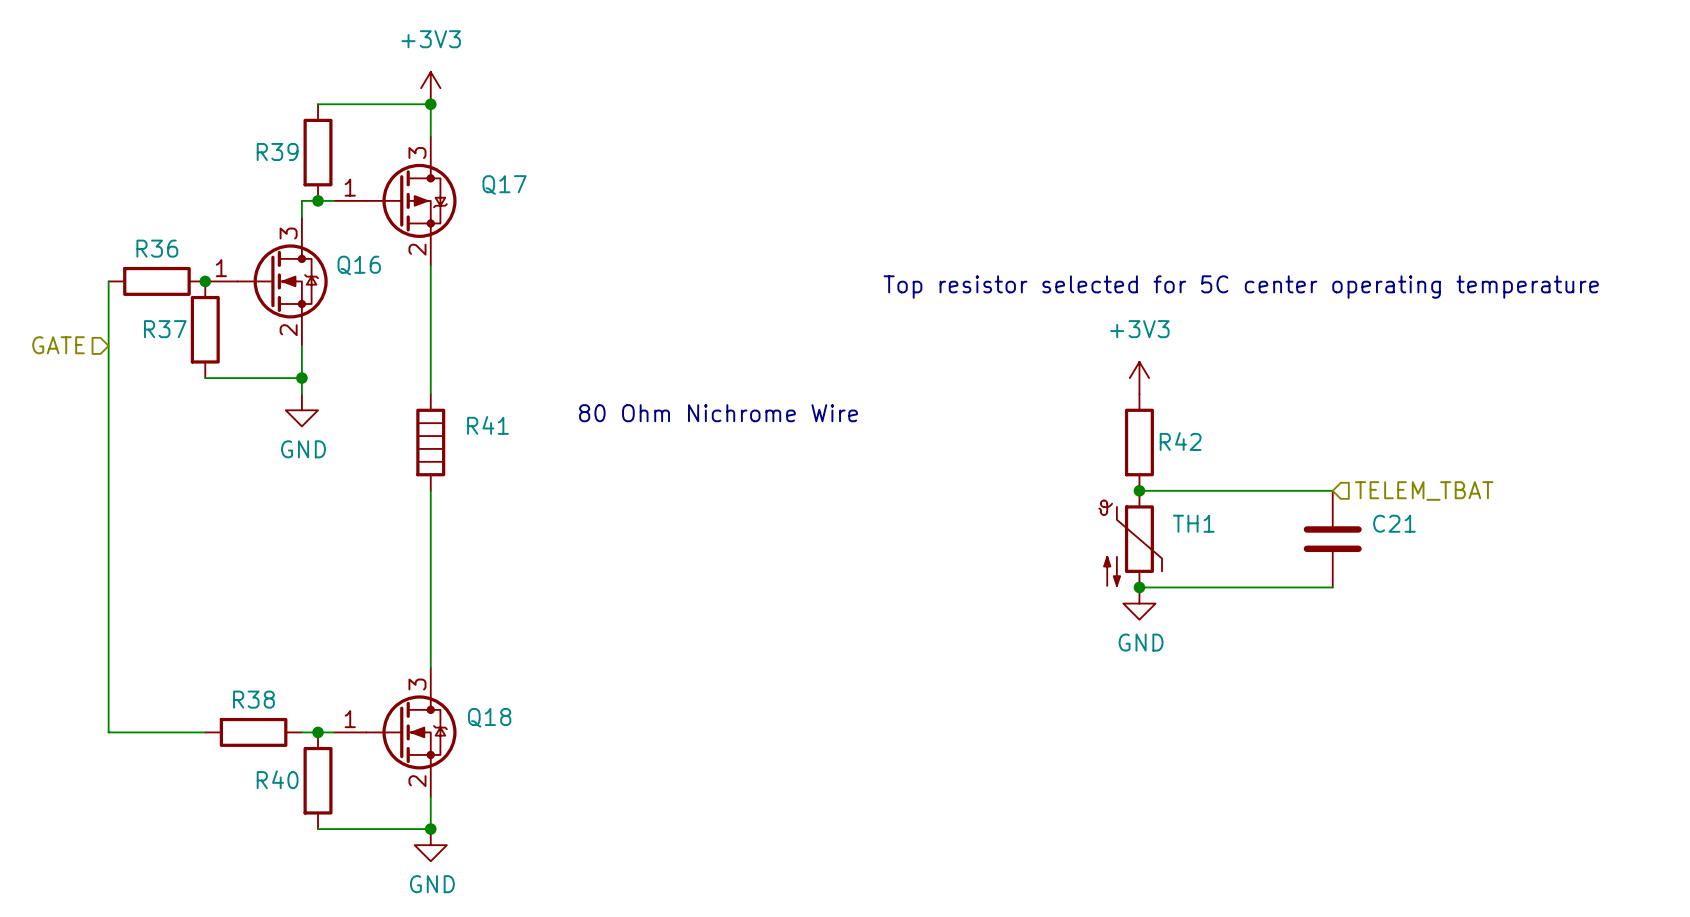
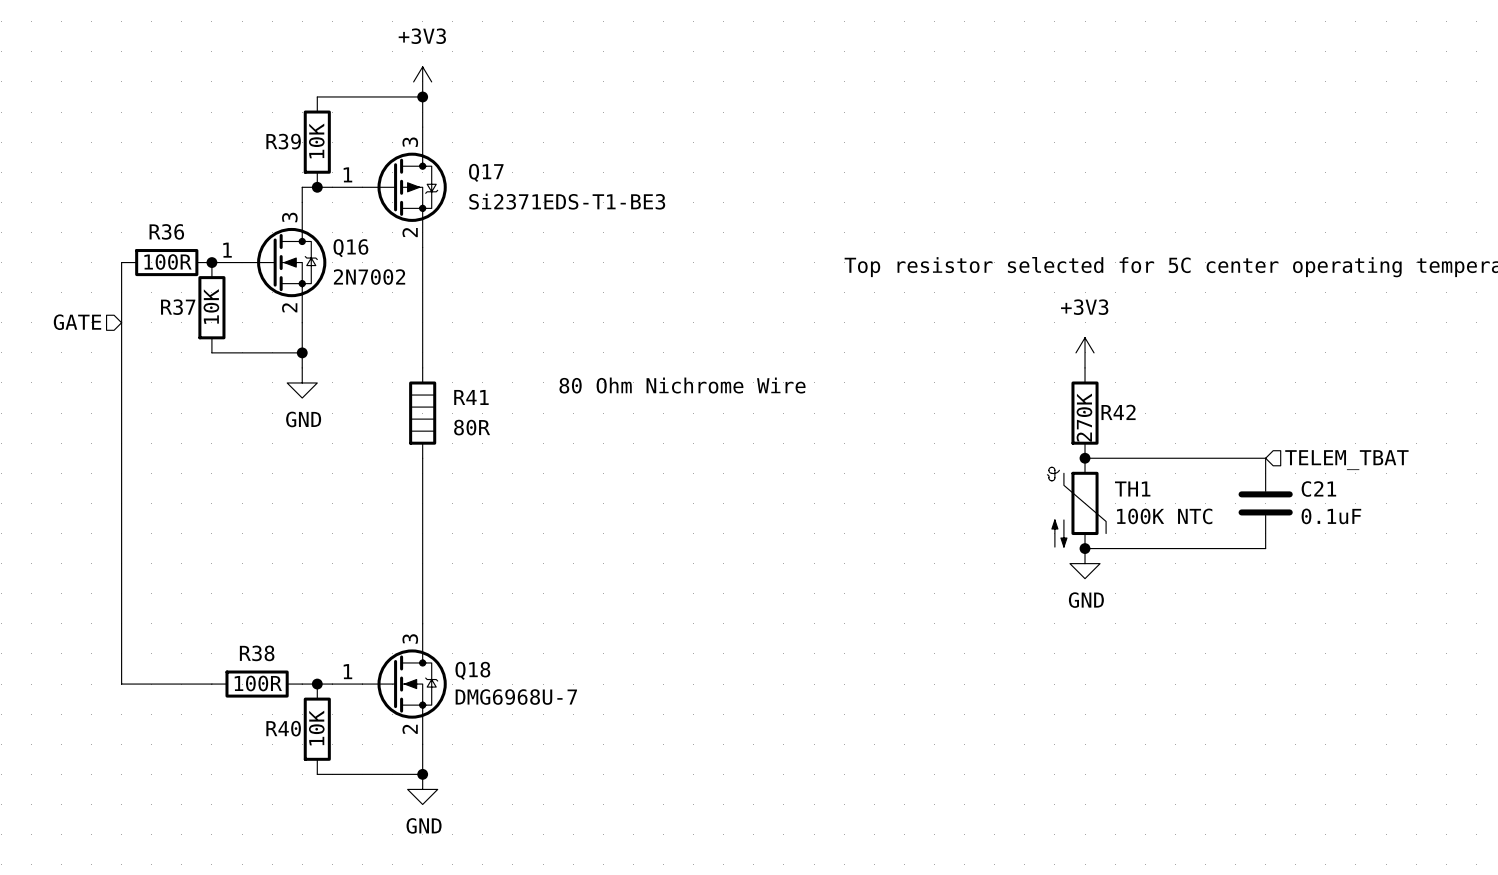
R39 value: none -> 10K (316, 140)
Q17 value: none -> Si2371EDS-T1-BE3 (567, 201)
R36 value: none -> 100R (168, 262)
Q16 value: none -> 2N7002 (369, 277)
R37 value: none -> 10K (211, 306)
R42 value: none -> 270K (1084, 417)
R41 value: none -> 80R (472, 427)
TH1 value: none -> 100K NTC (1164, 516)
C21 value: none -> 0.1uF (1331, 516)
R38 value: none -> 100R (258, 683)
Q18 value: none -> DMG6968U-7 (516, 697)
R40 value: none -> 10K (316, 728)

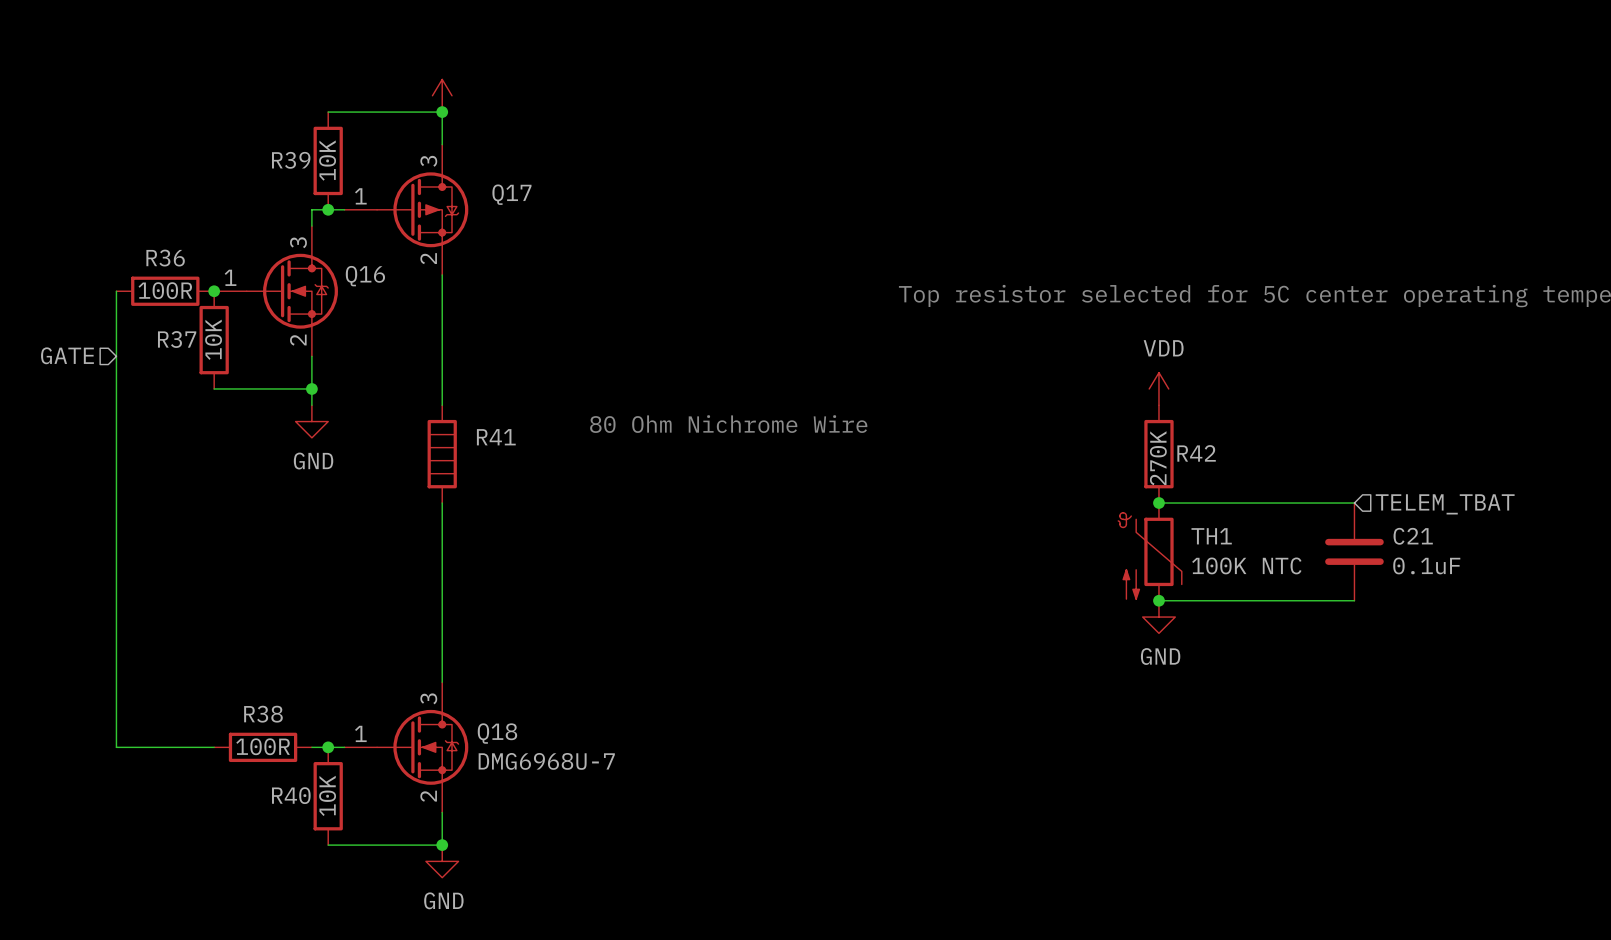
power symbol text: +3V3 (422, 36) -> none
Q17 value: Si2371EDS-T1-BE3 (567, 201) -> none
Q16 value: 2N7002 (369, 277) -> none
power symbol: +3V3 (1085, 352) -> VDD (1158, 388)
R41 value: 80R (472, 427) -> none

